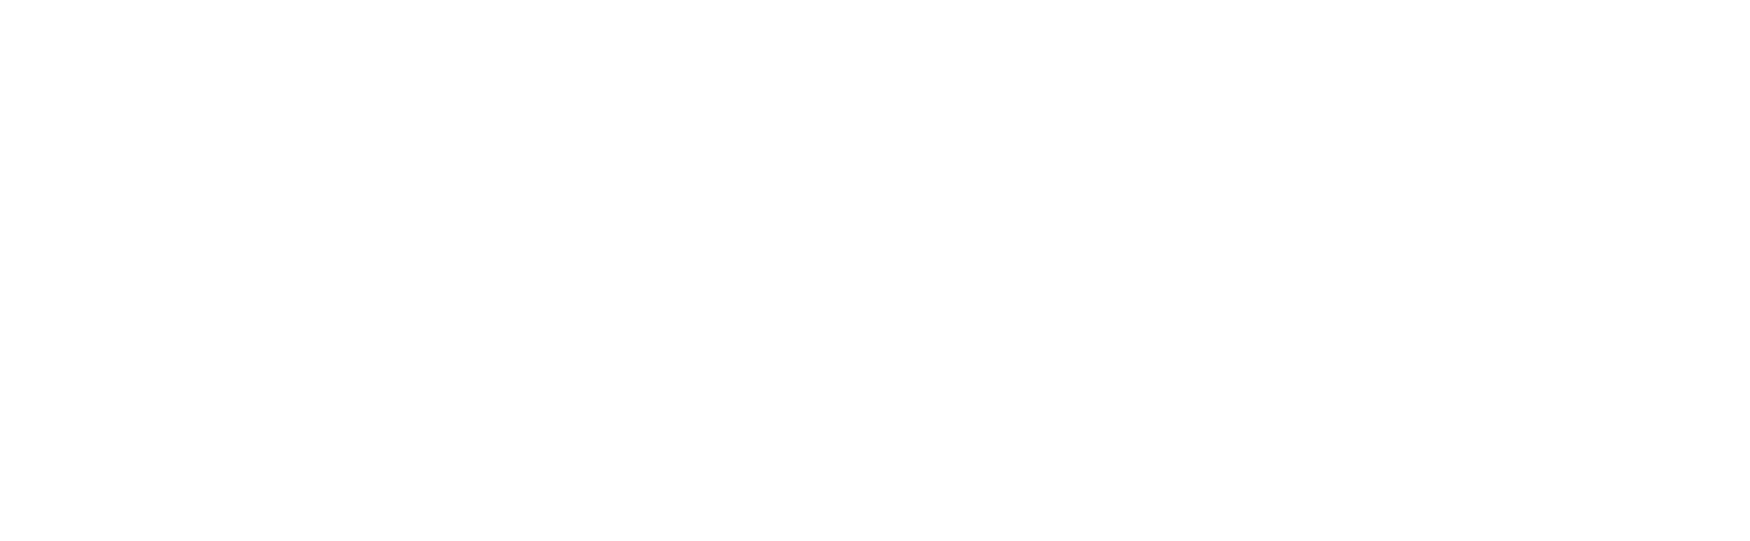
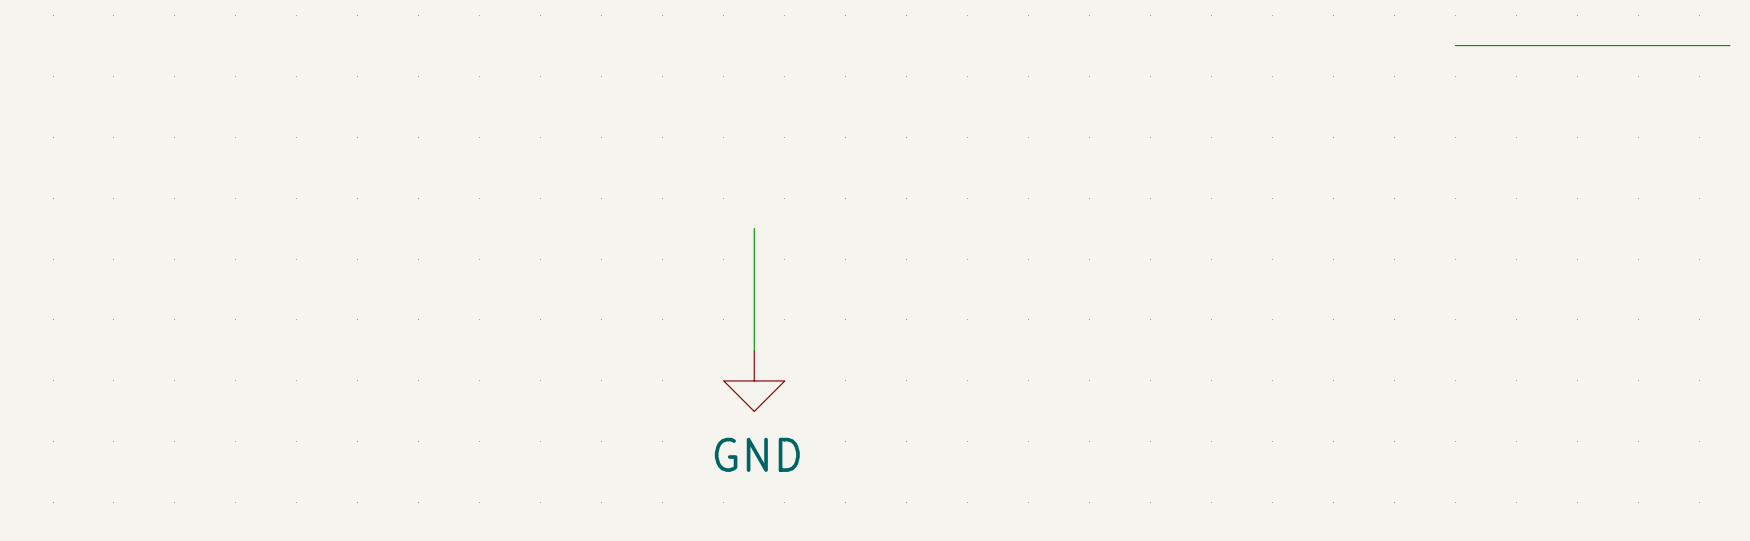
wire: none -> (1455, 45) (1729, 45)
wire: none -> (754, 228) (754, 350)
power symbol: none -> GND (754, 380)

